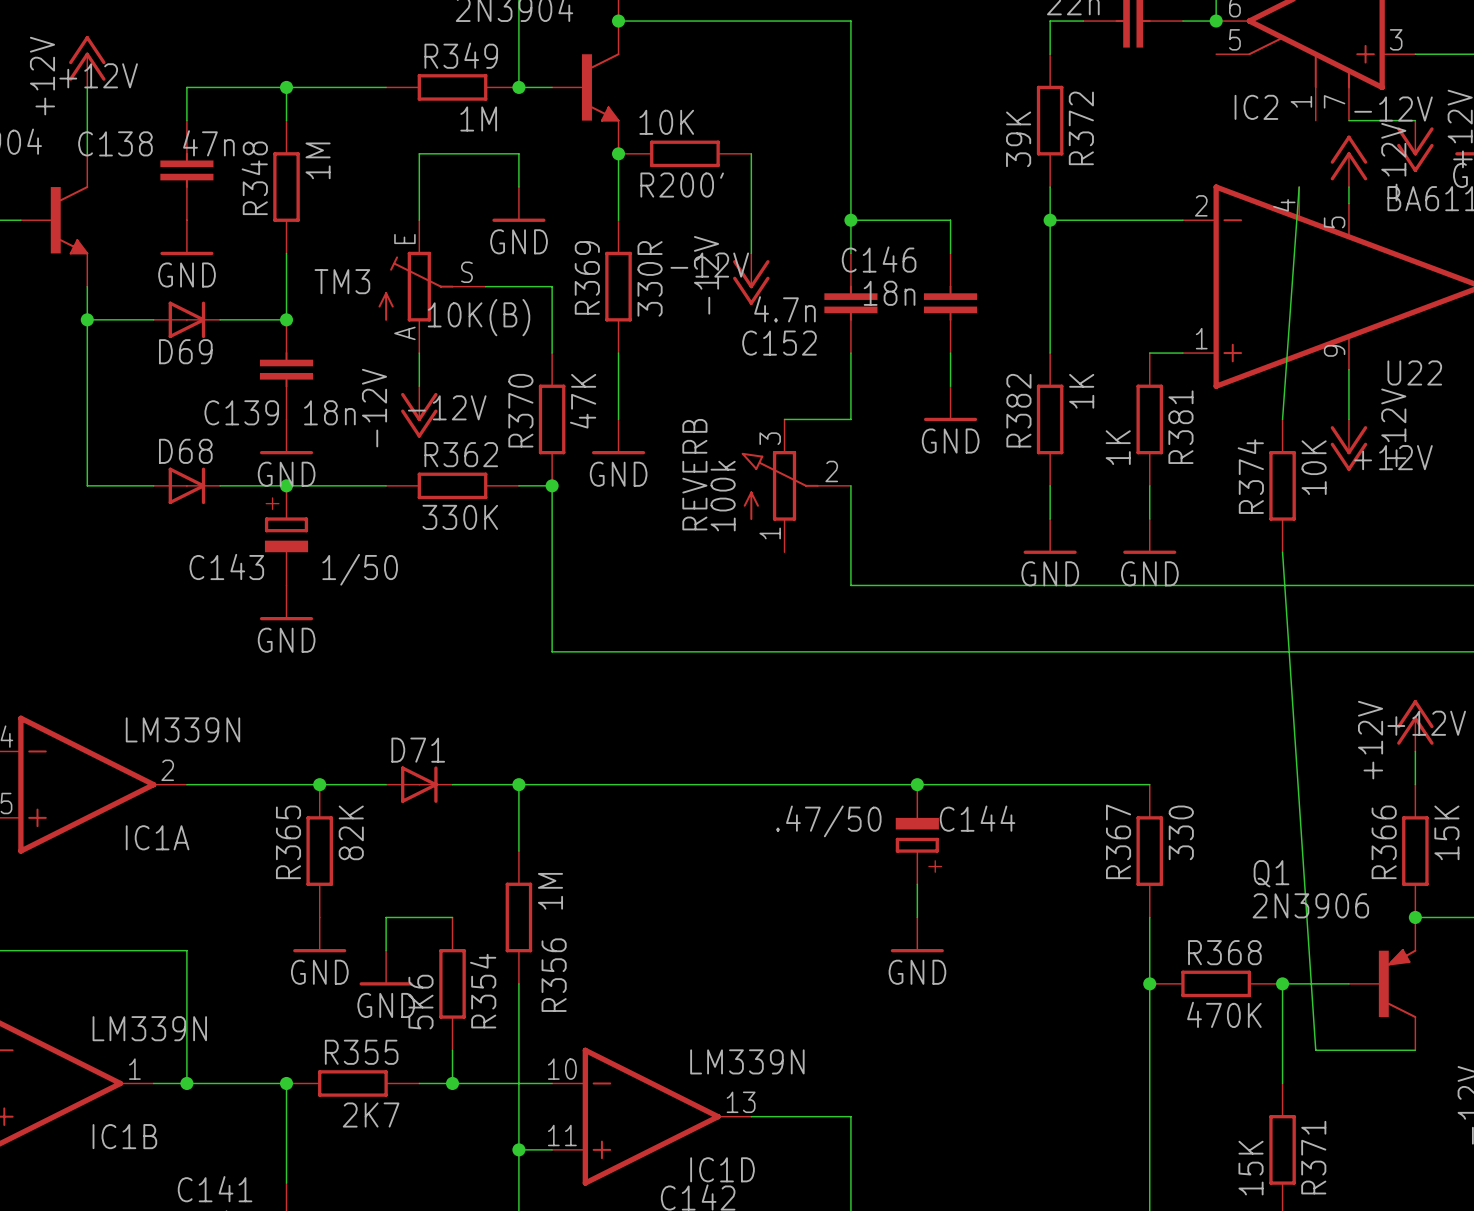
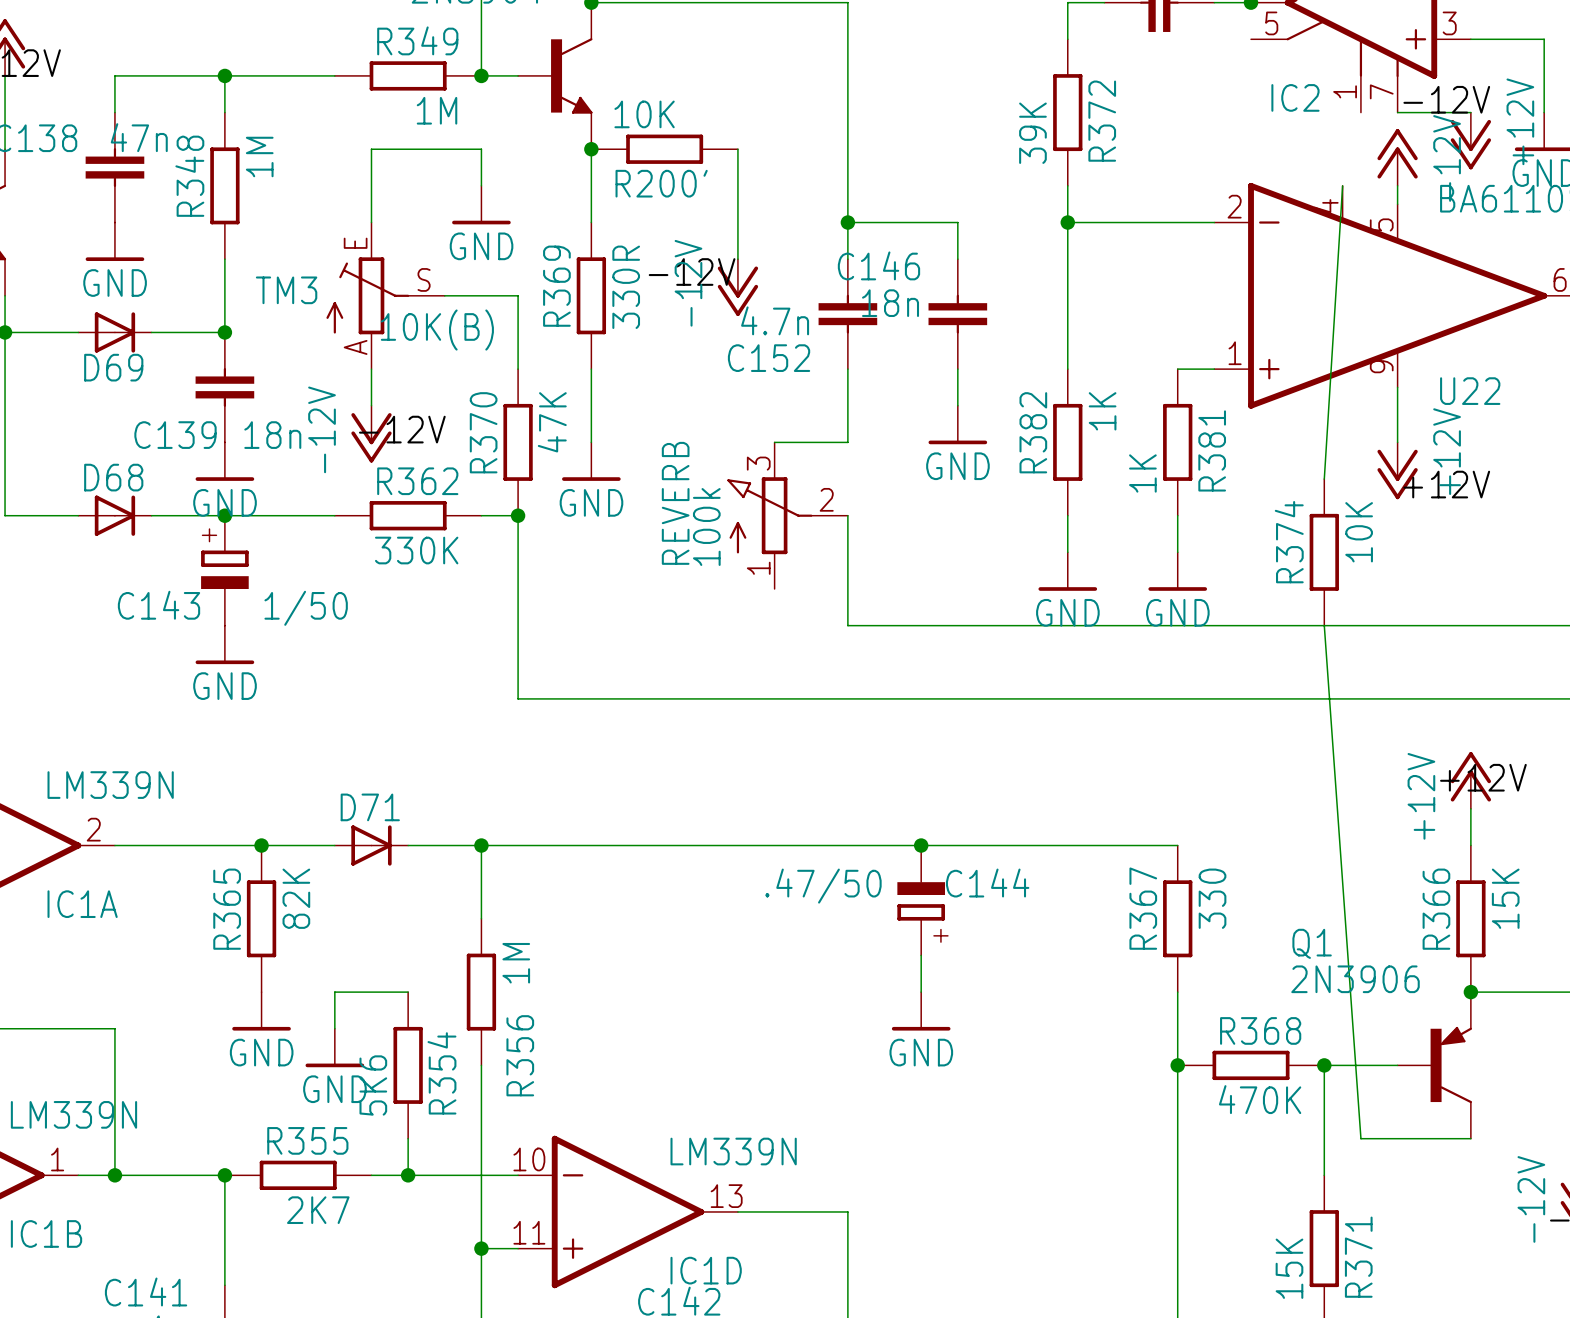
wire: (1299, 187) (1282, 419) -> (1342, 185) (1324, 479)
R374 position: (1282, 485) -> (1324, 552)
wire: (1282, 552) (1315, 1050) -> (1324, 625) (1360, 1138)

